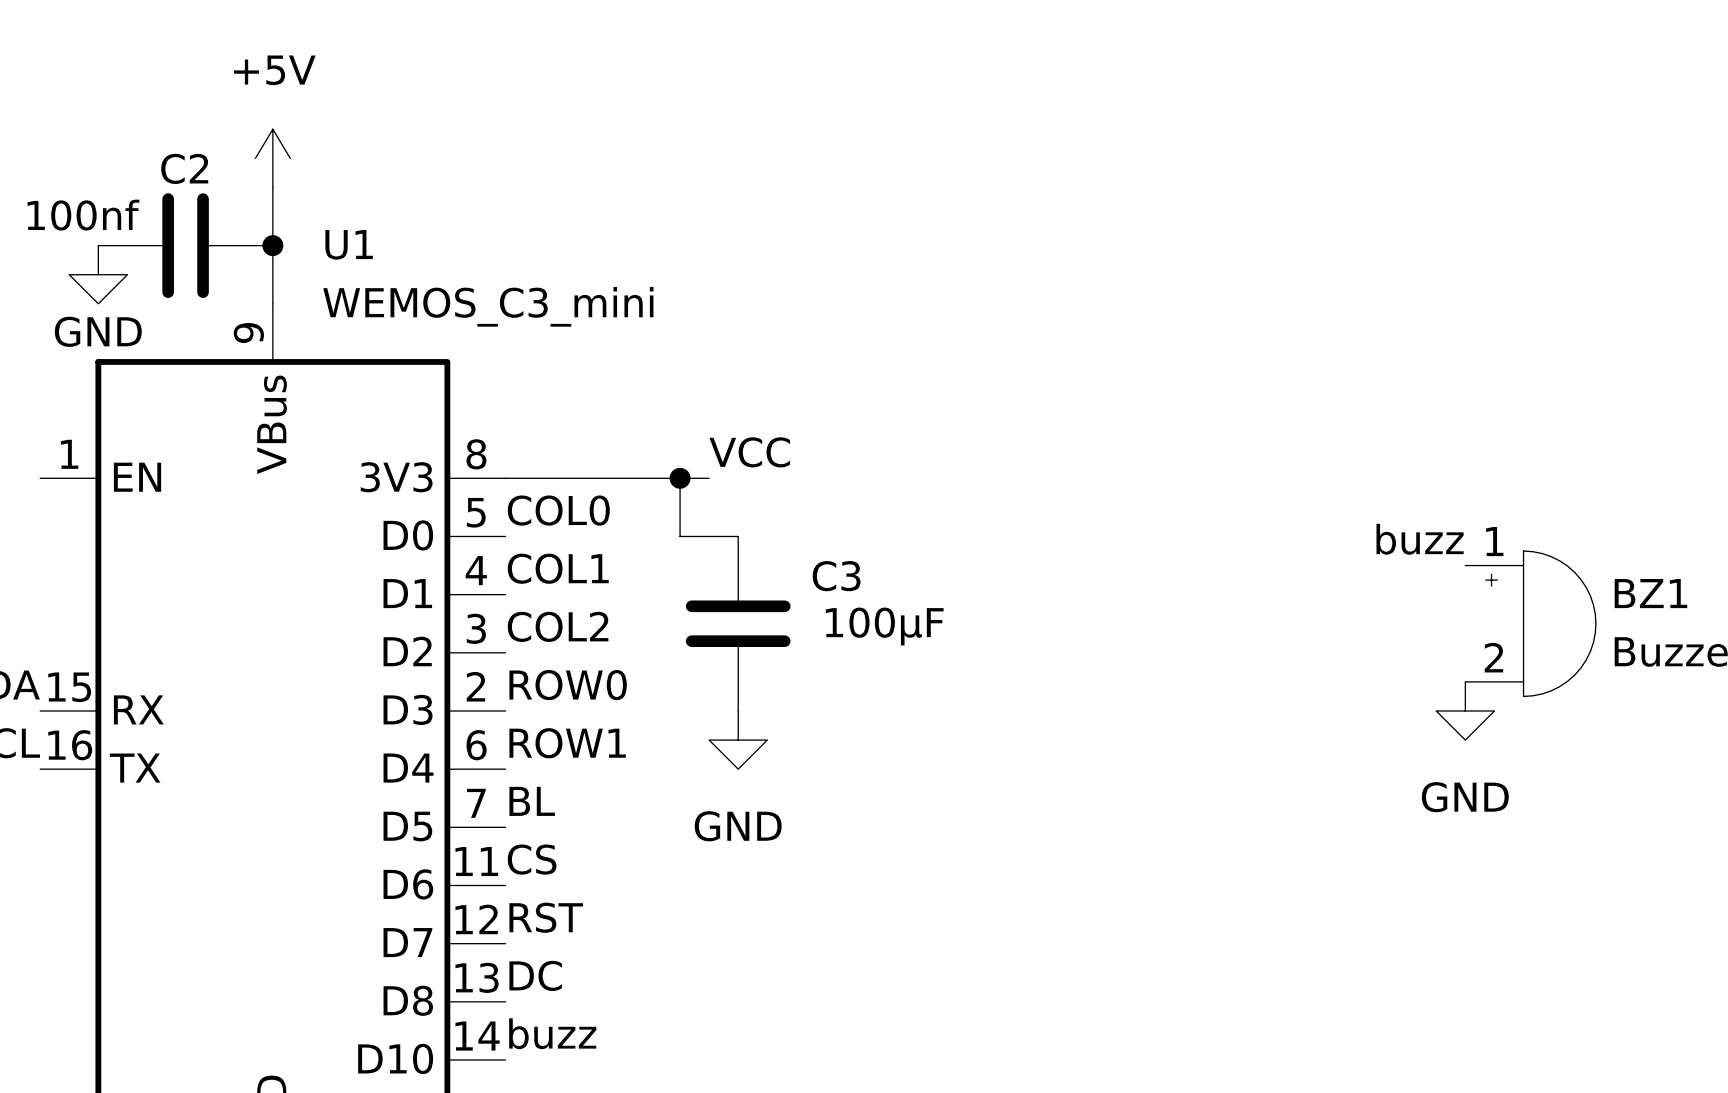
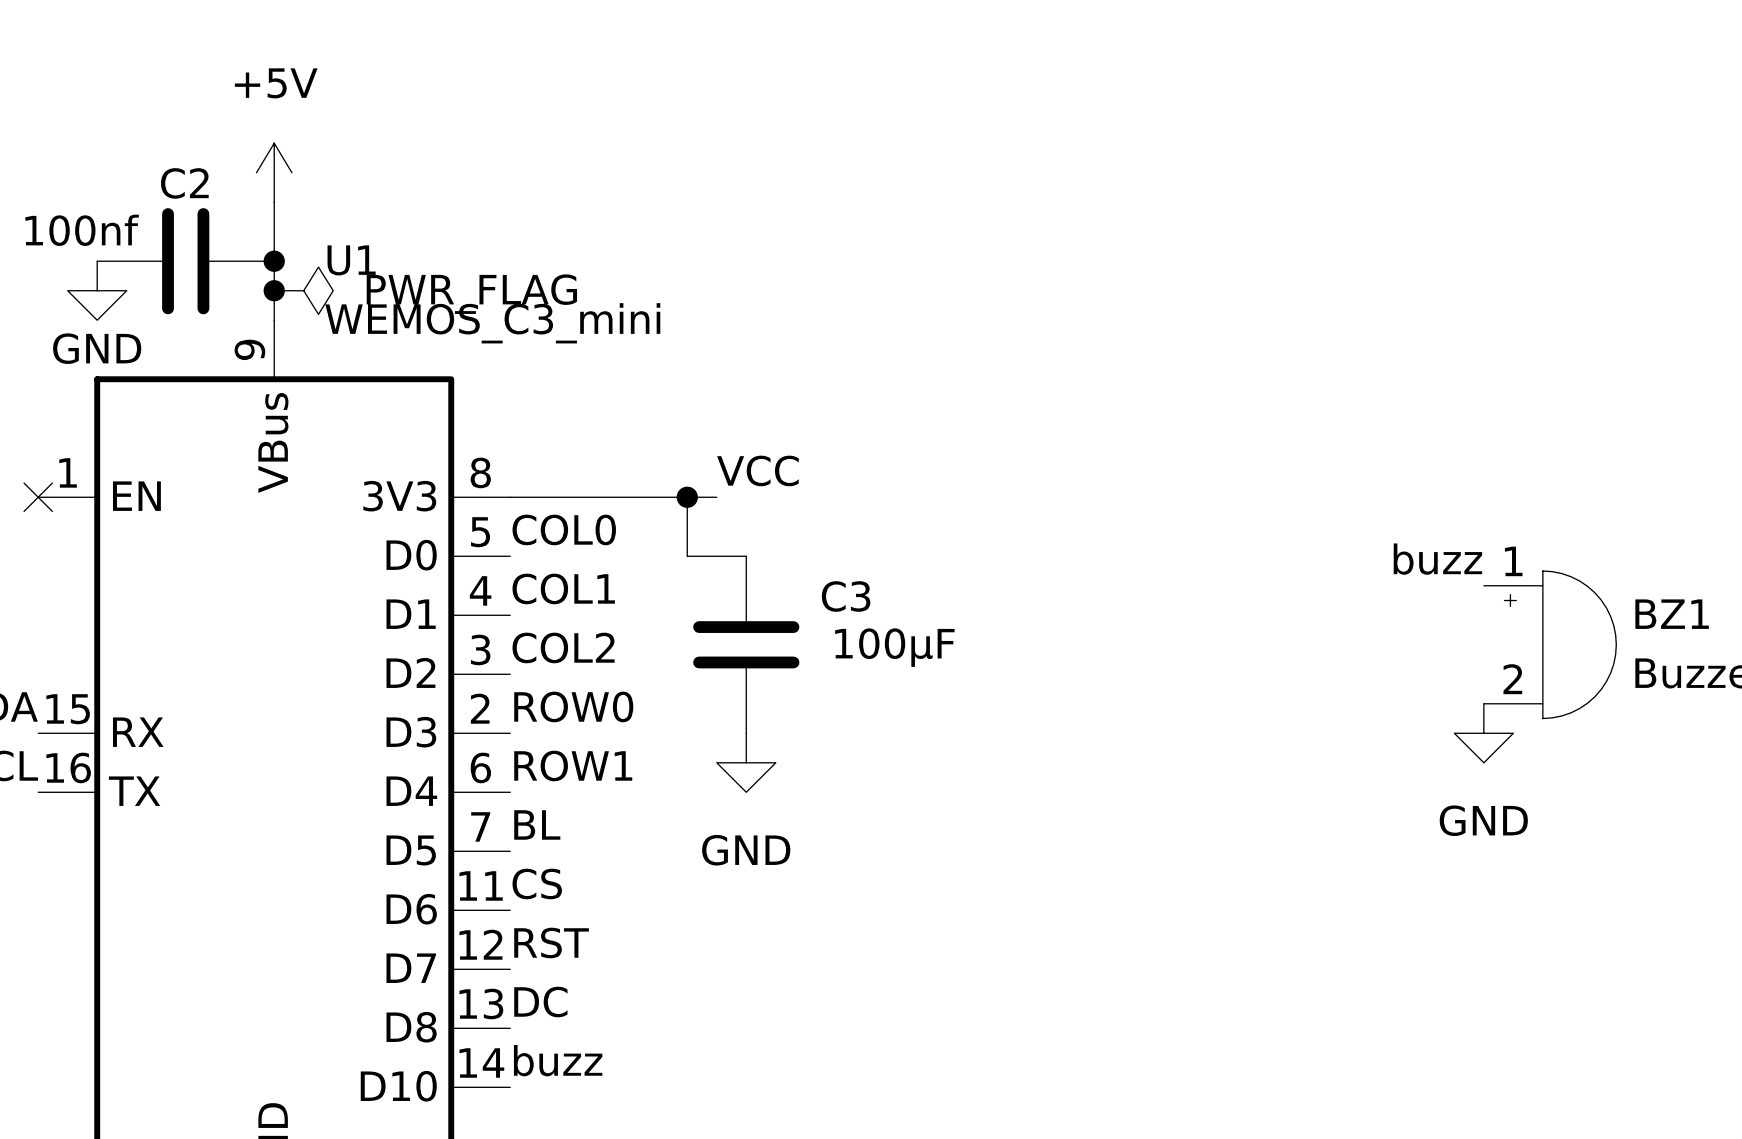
junction: none -> (274, 290)
power symbol: none -> PWR_FLAG (303, 290)
no-connect mark: none -> (38, 497)

